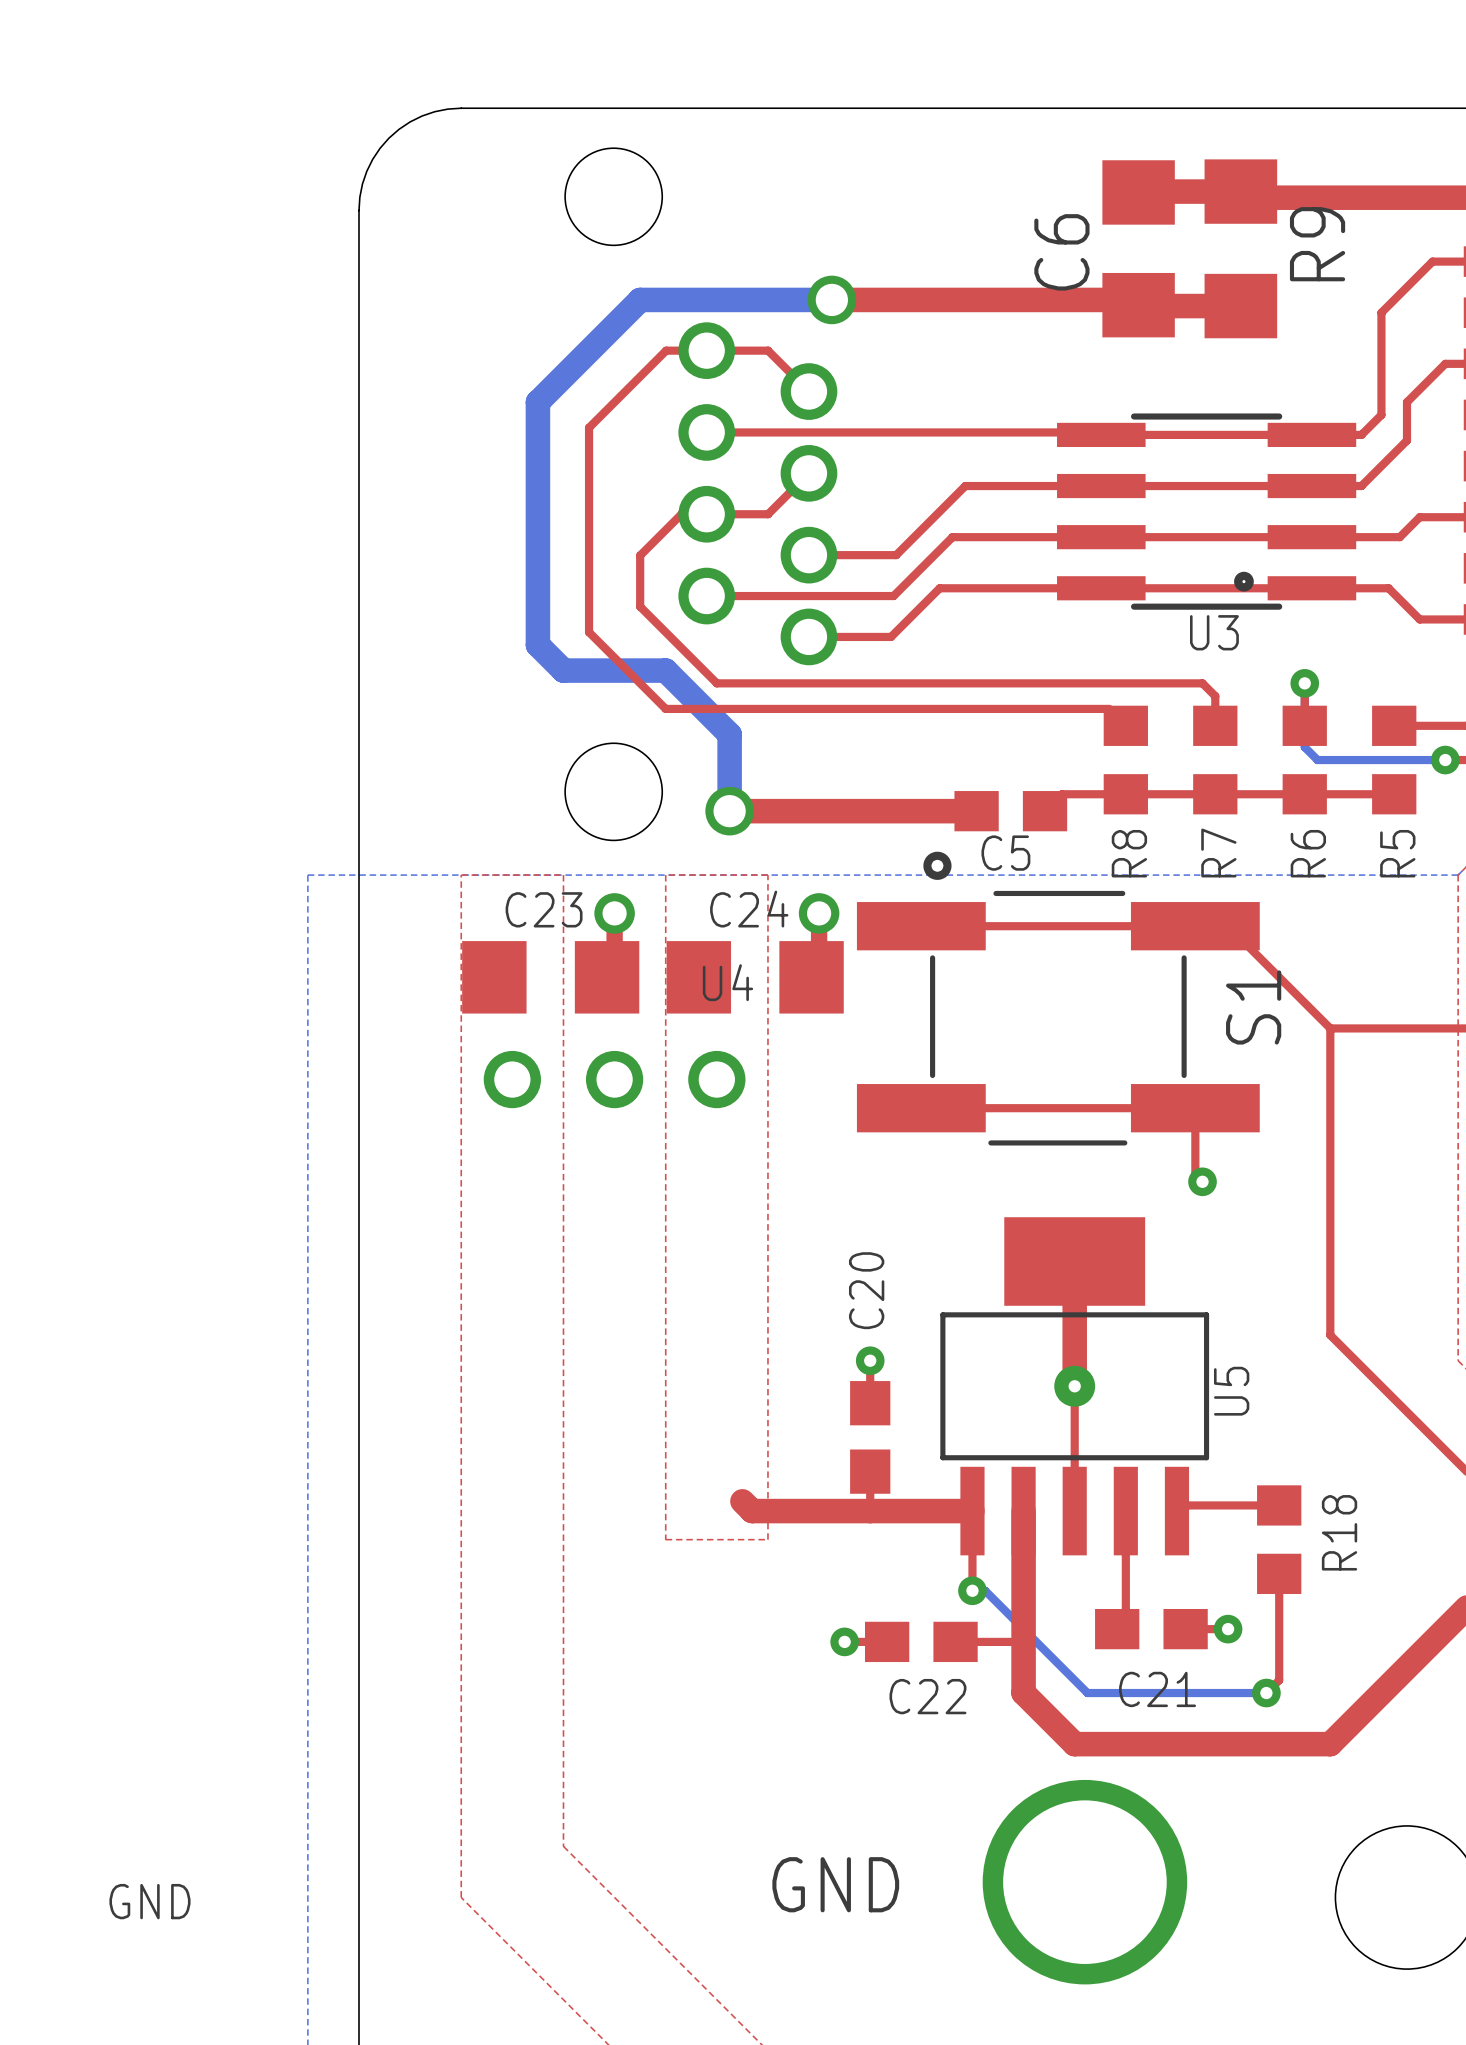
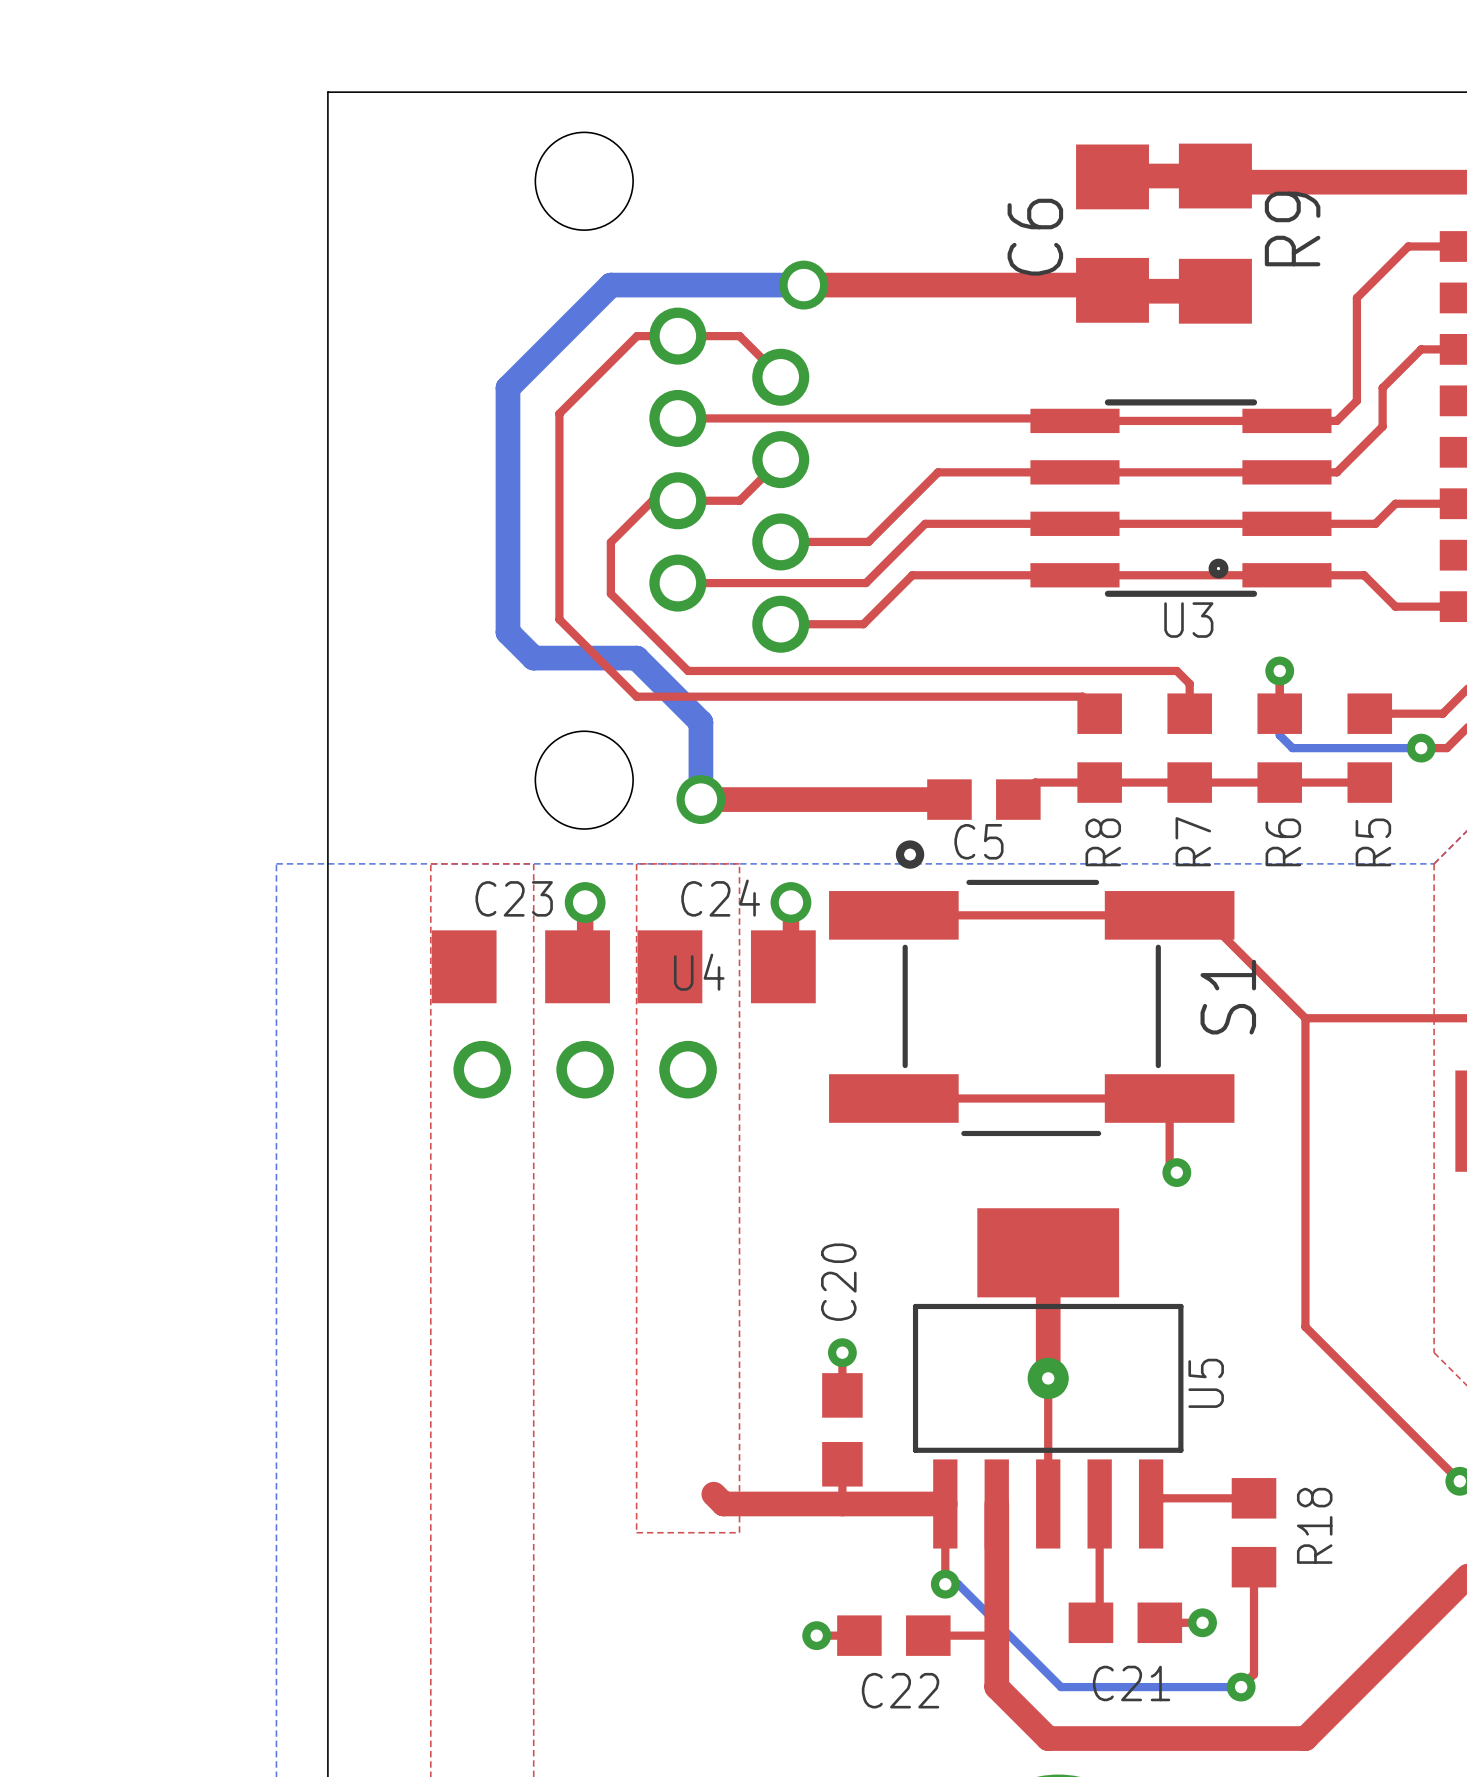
board edge: (461, 108) (434, 111) (422, 116) (398, 129) (388, 138) (380, 148) (366, 171) (362, 184) (358, 210) -> (430, 92) (327, 92) (327, 195)

